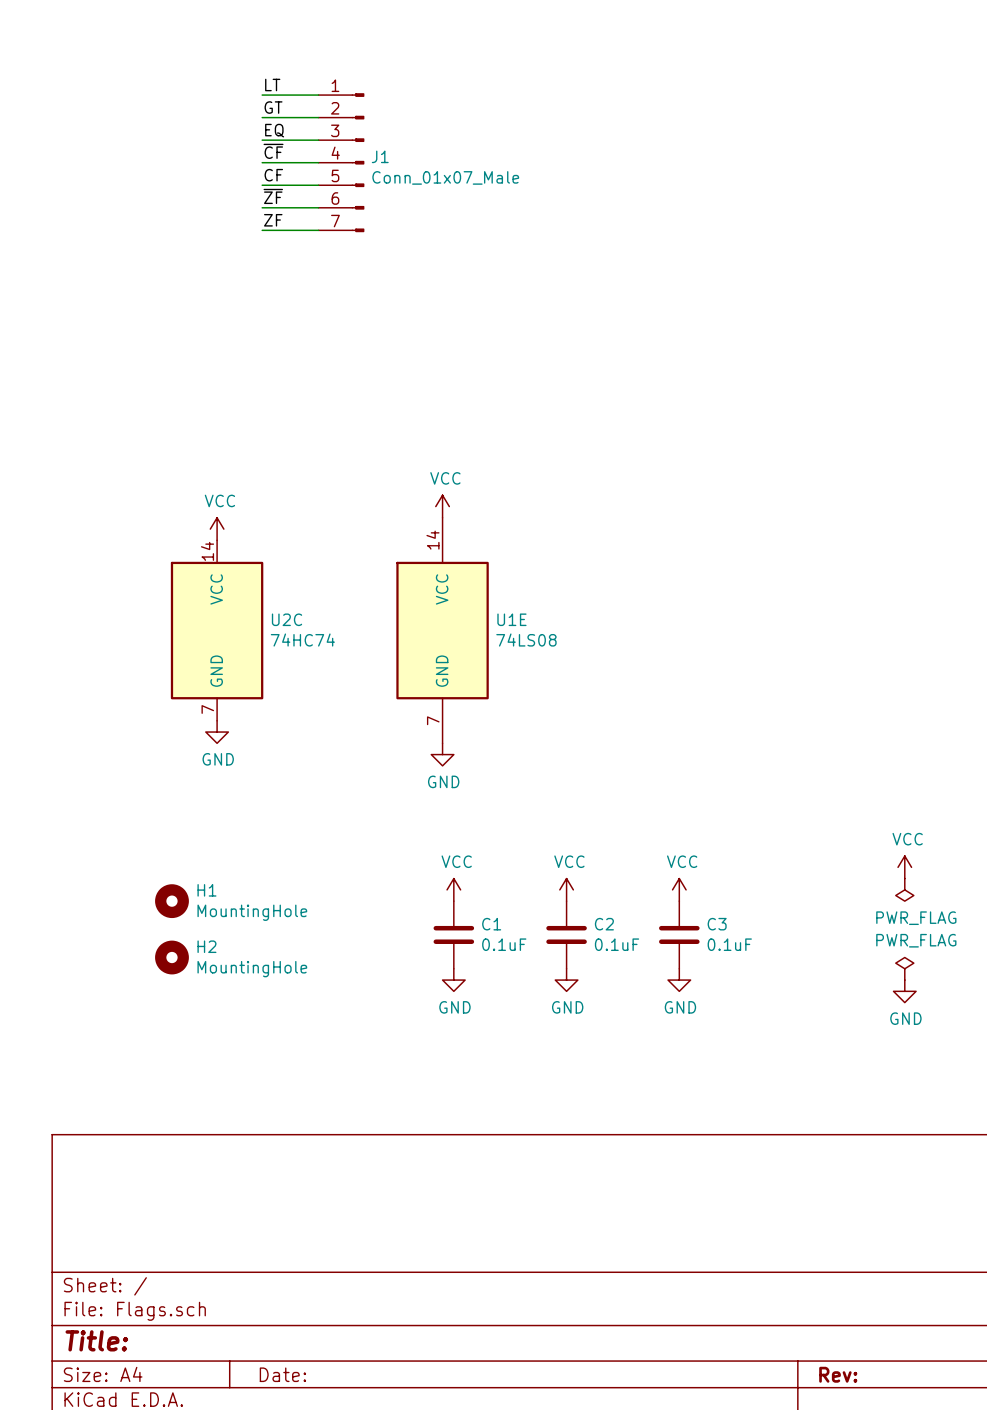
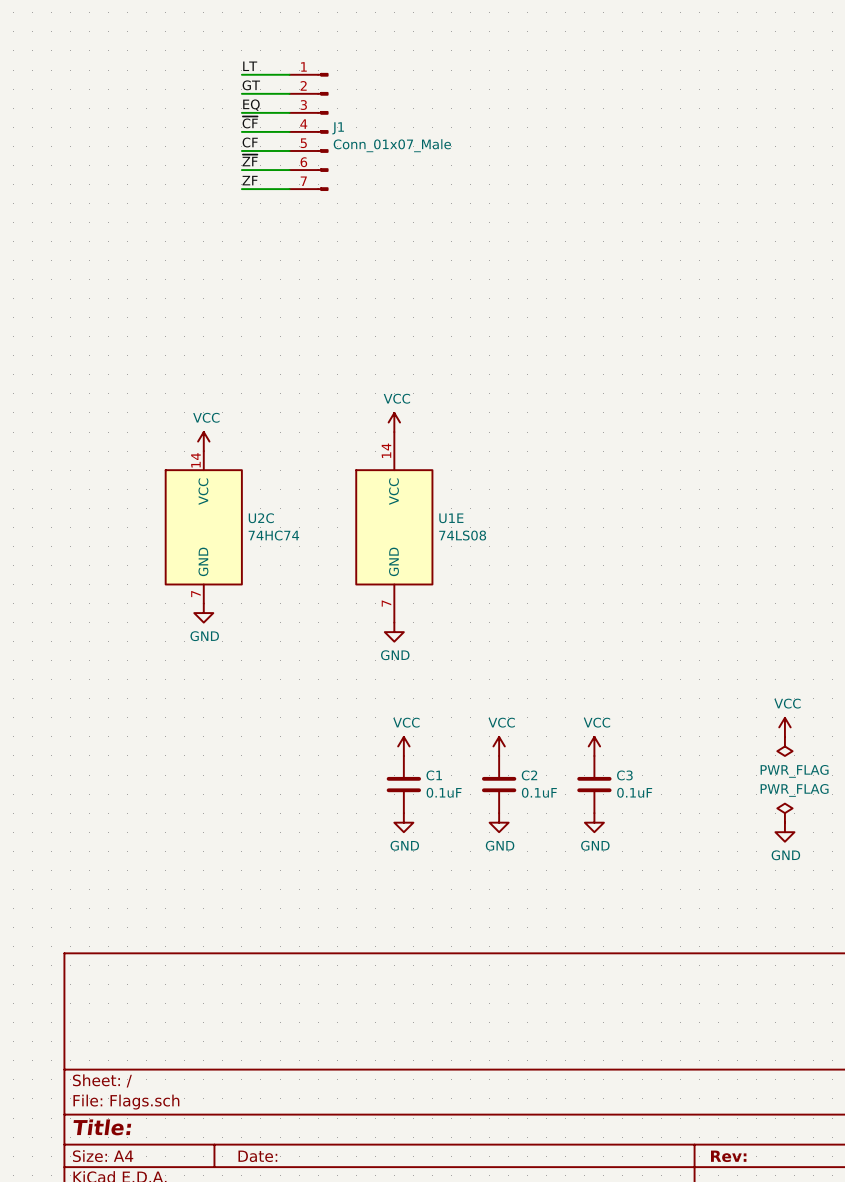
H1: MountingHole (171, 901) -> none
H2: MountingHole (171, 957) -> none

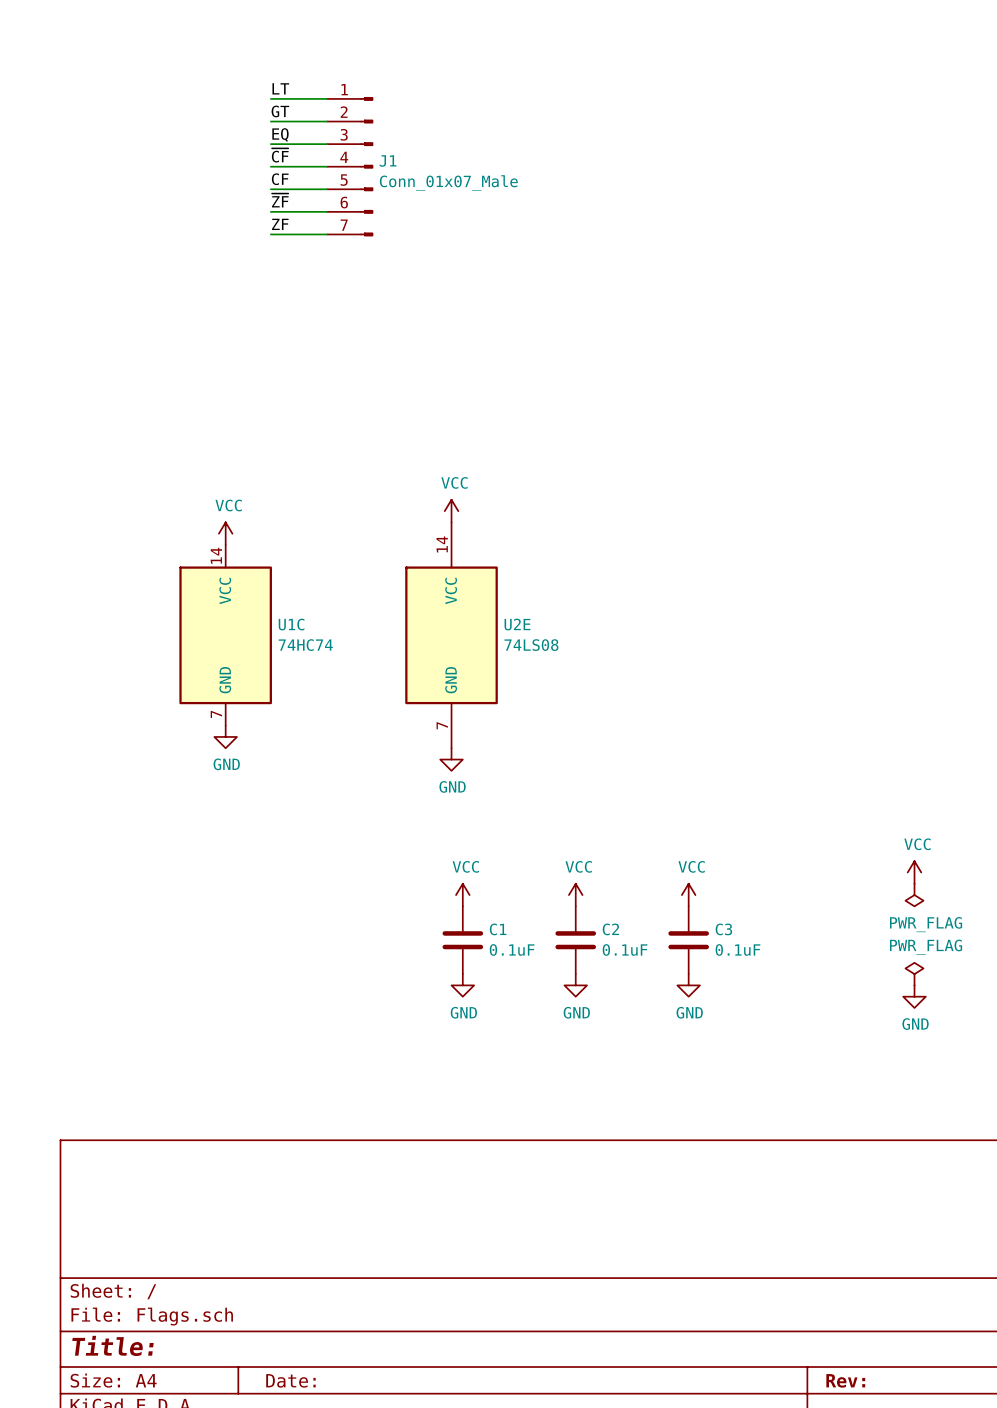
U2C name: U2C (261, 518) -> U1C (291, 624)
U1E name: U1E (451, 518) -> U2E (517, 624)

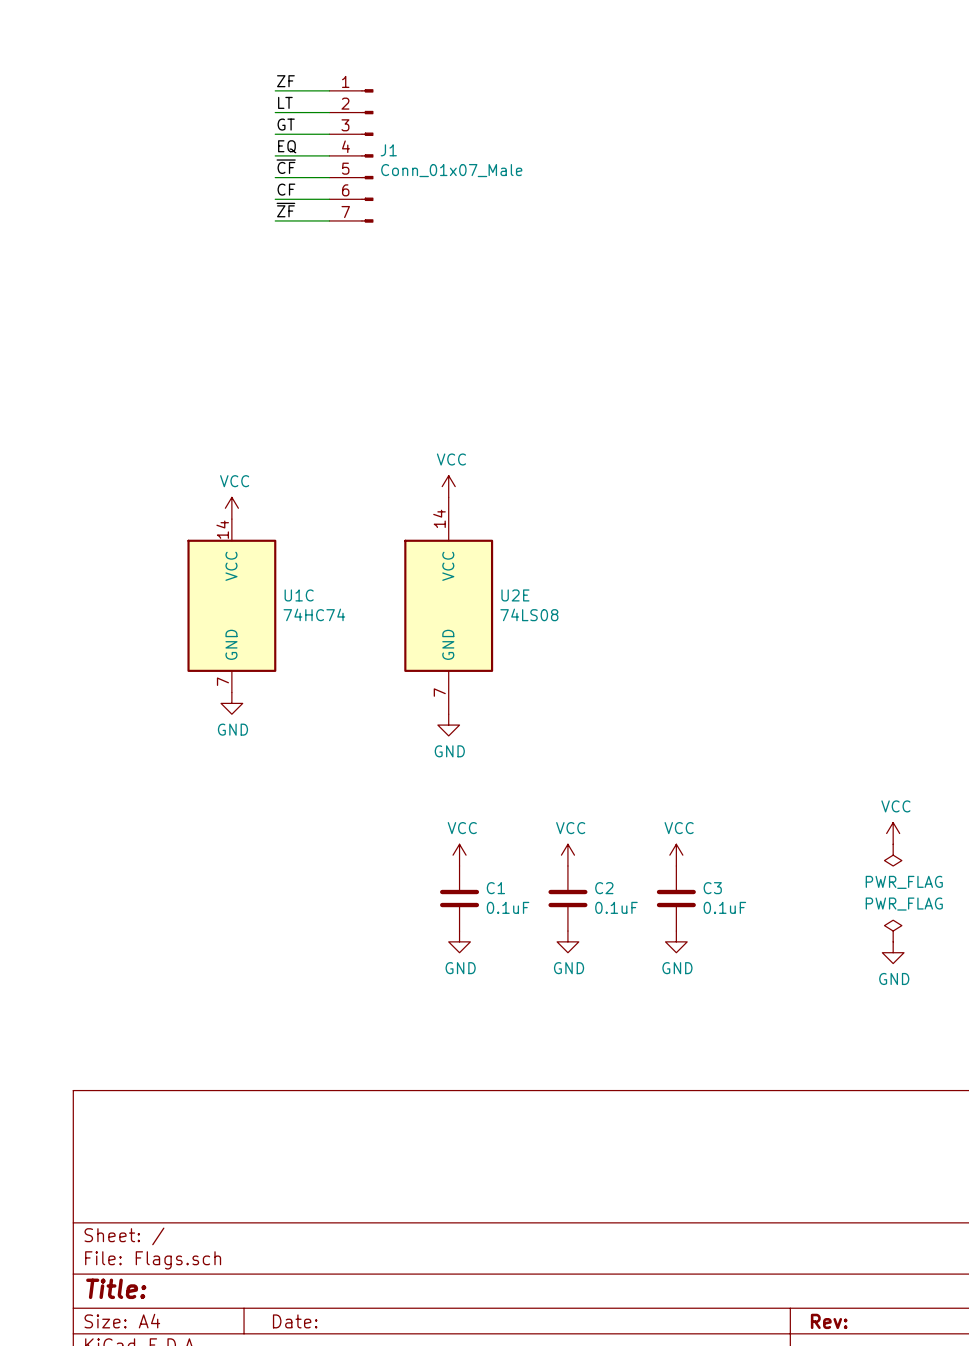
label: LT (280, 88) -> ZF (285, 81)
label: GT (280, 111) -> LT (285, 102)
label: EQ (280, 134) -> GT (286, 124)
label: ~{CF} (280, 155) -> EQ (287, 146)
label: CF (280, 179) -> ~{CF} (286, 166)
label: ~{ZF} (280, 200) -> CF (286, 189)
label: ZF (280, 224) -> ~{ZF} (285, 210)

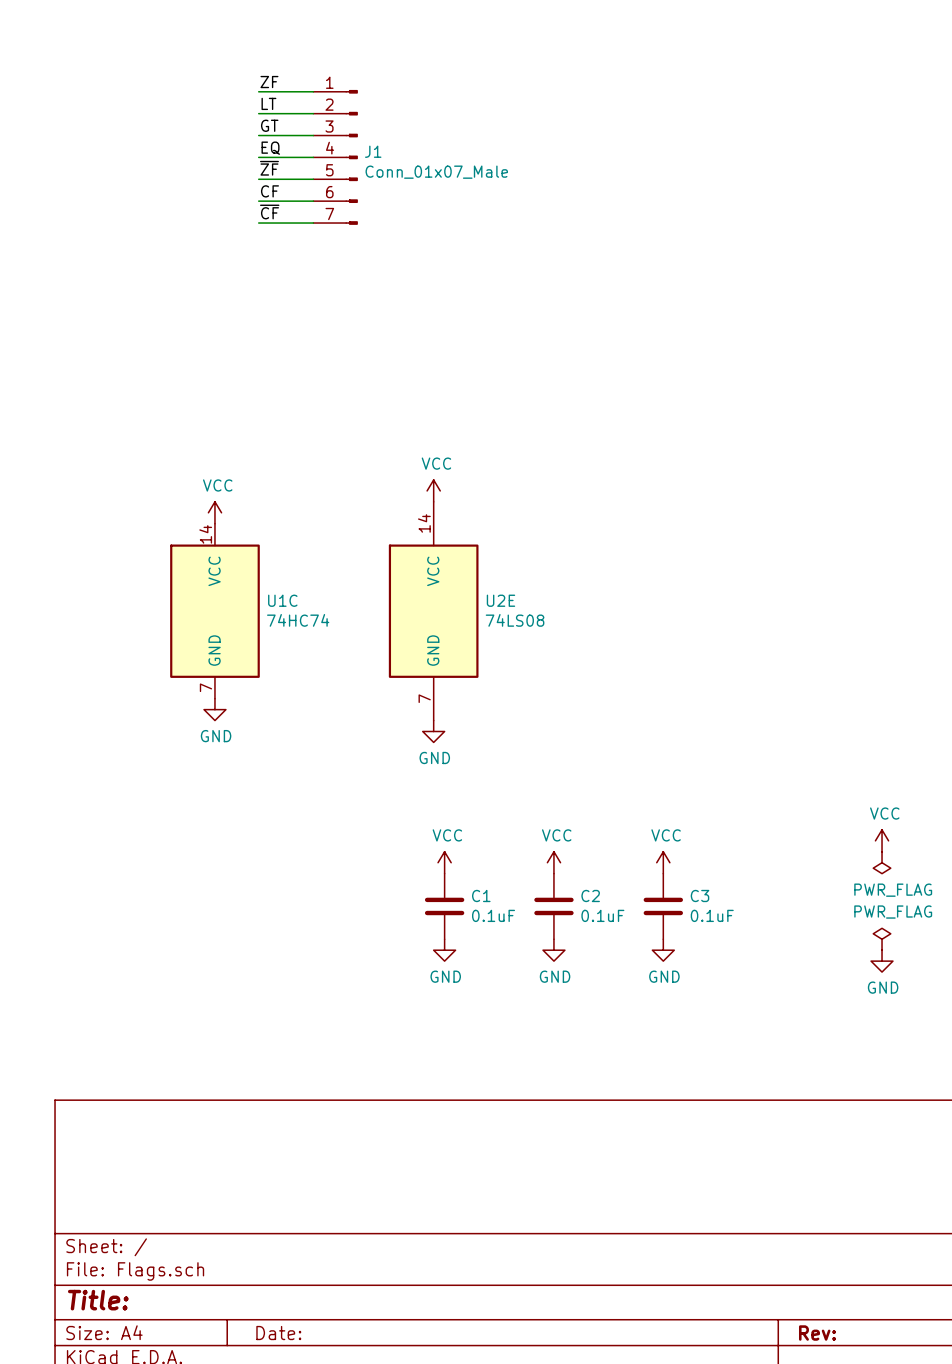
label: ~{CF} (286, 166) -> ~{ZF} (269, 168)
label: ~{ZF} (285, 210) -> ~{CF} (269, 212)

